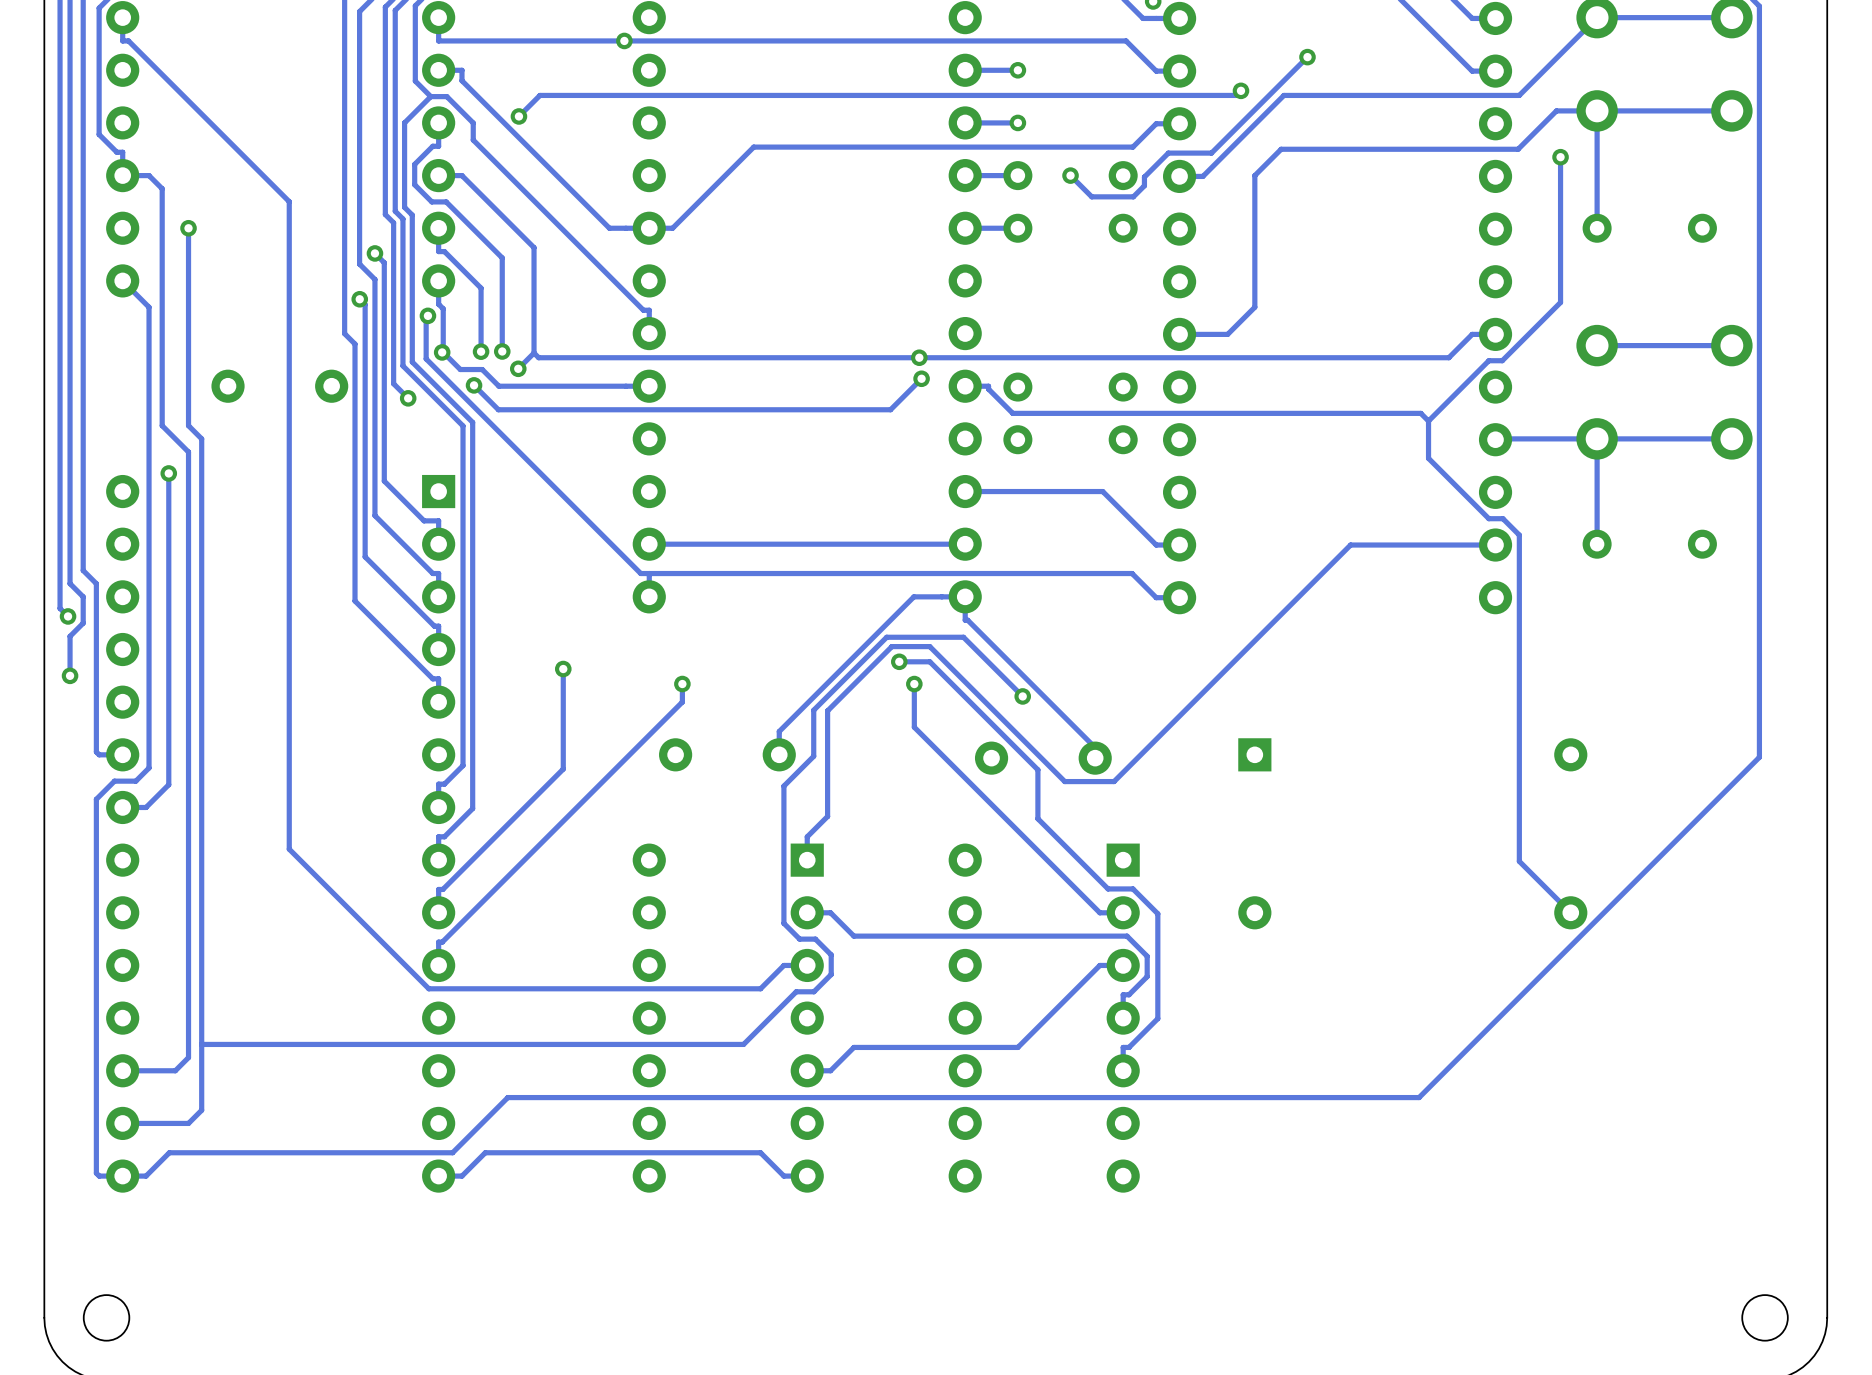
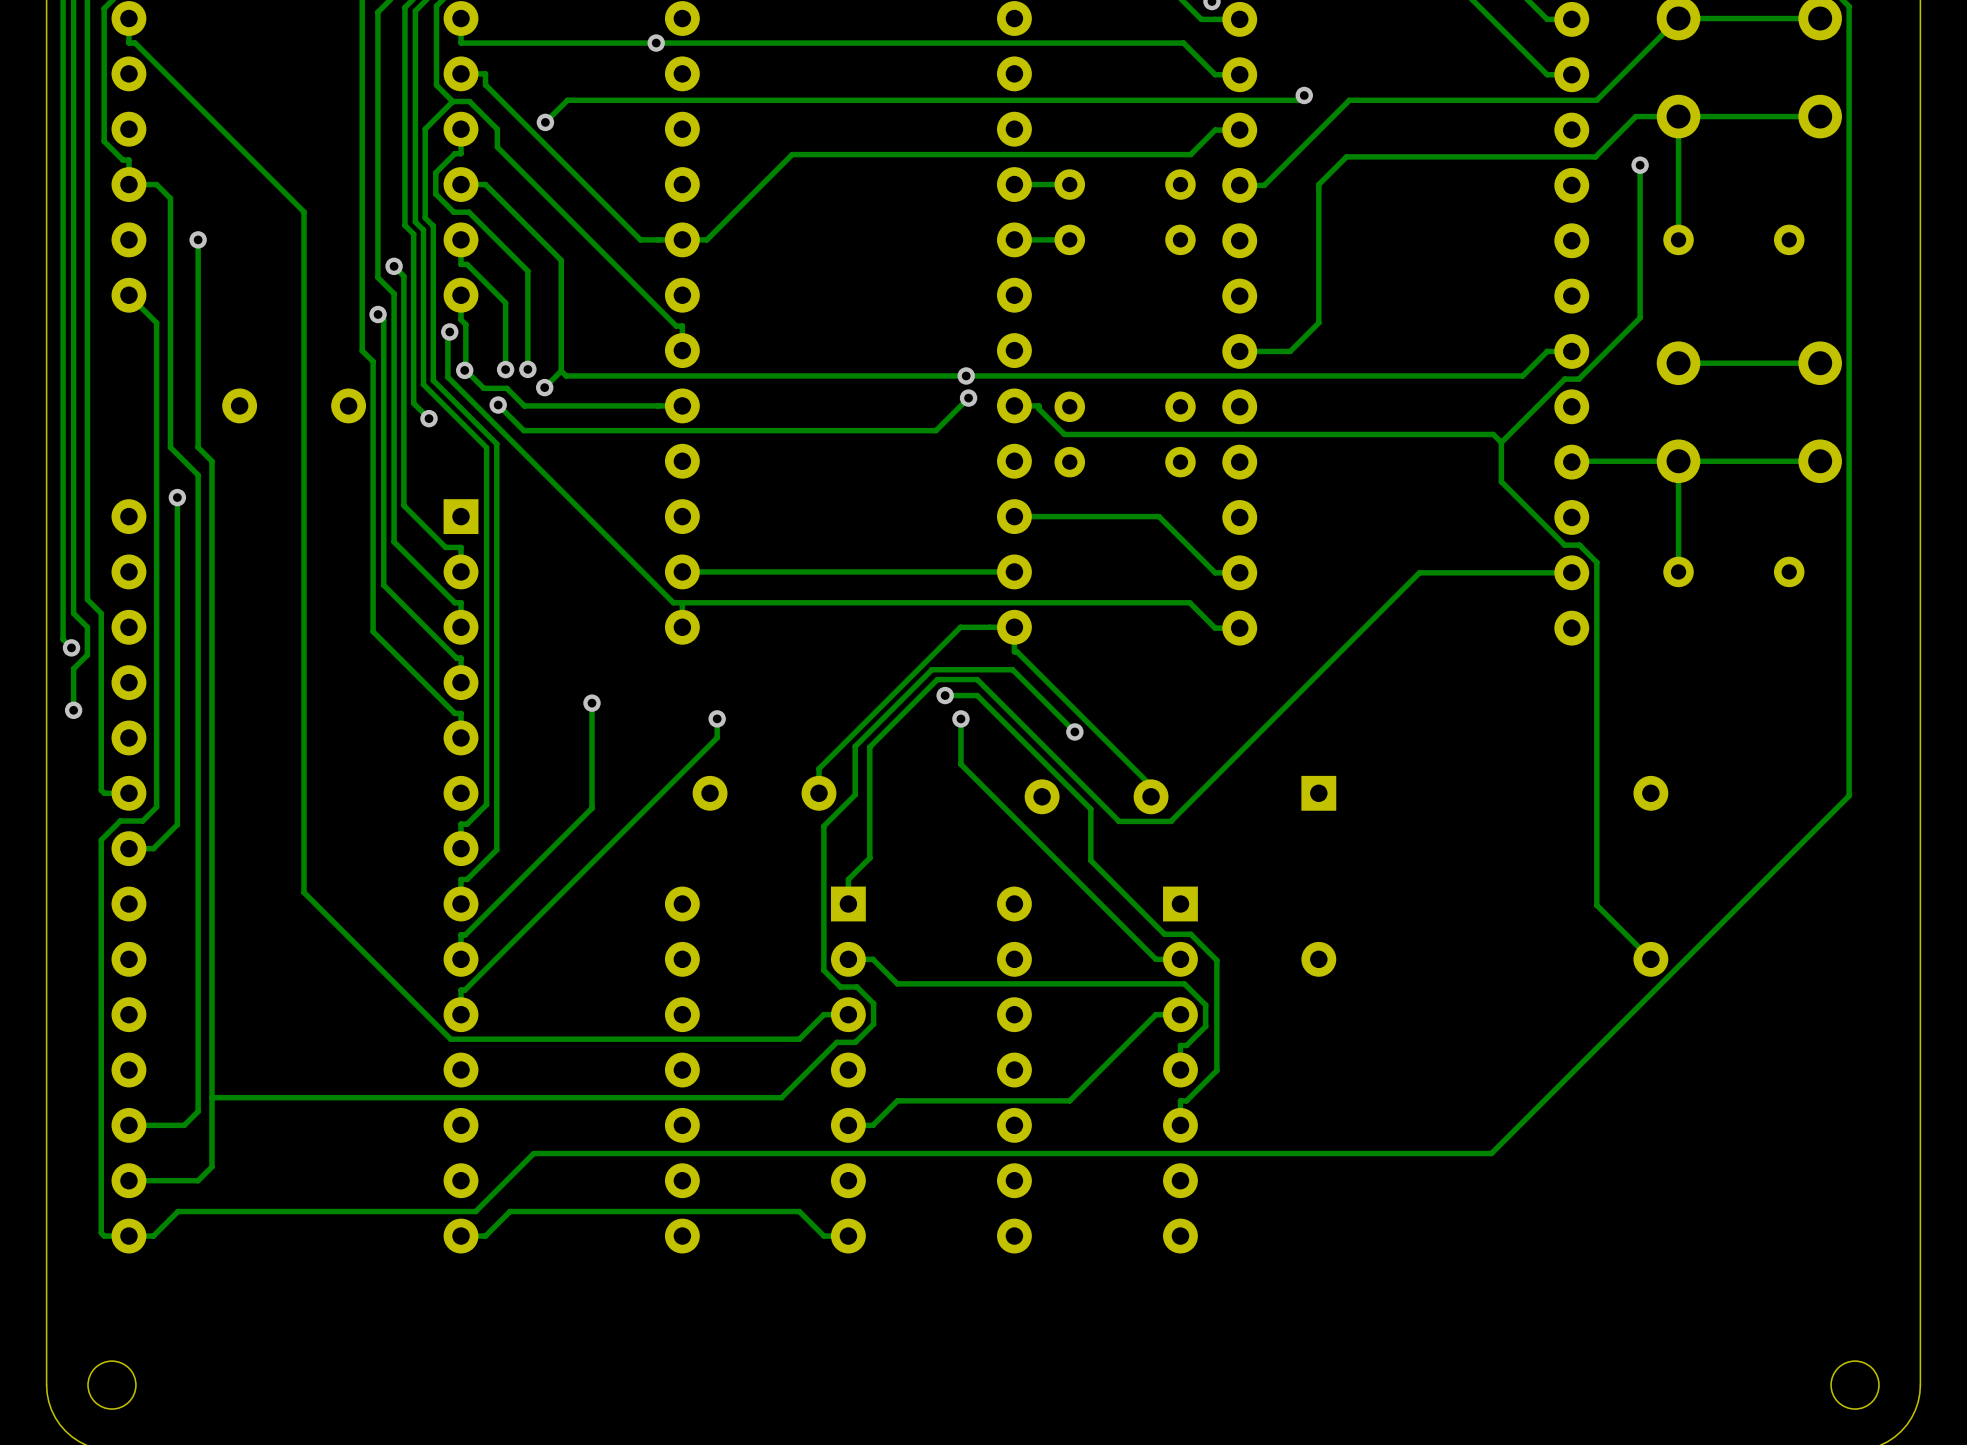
track: (1307, 57) (1211, 153) (1168, 153) (1144, 177) (1144, 185) (1133, 196) (1091, 196) (1070, 175) -> none
via: (1307, 57) -> none
track: (1017, 70) (965, 70) -> none
via: (1017, 70) -> none
track: (1017, 122) (965, 122) -> none
via: (1017, 122) -> none
via: (1070, 175) -> none

